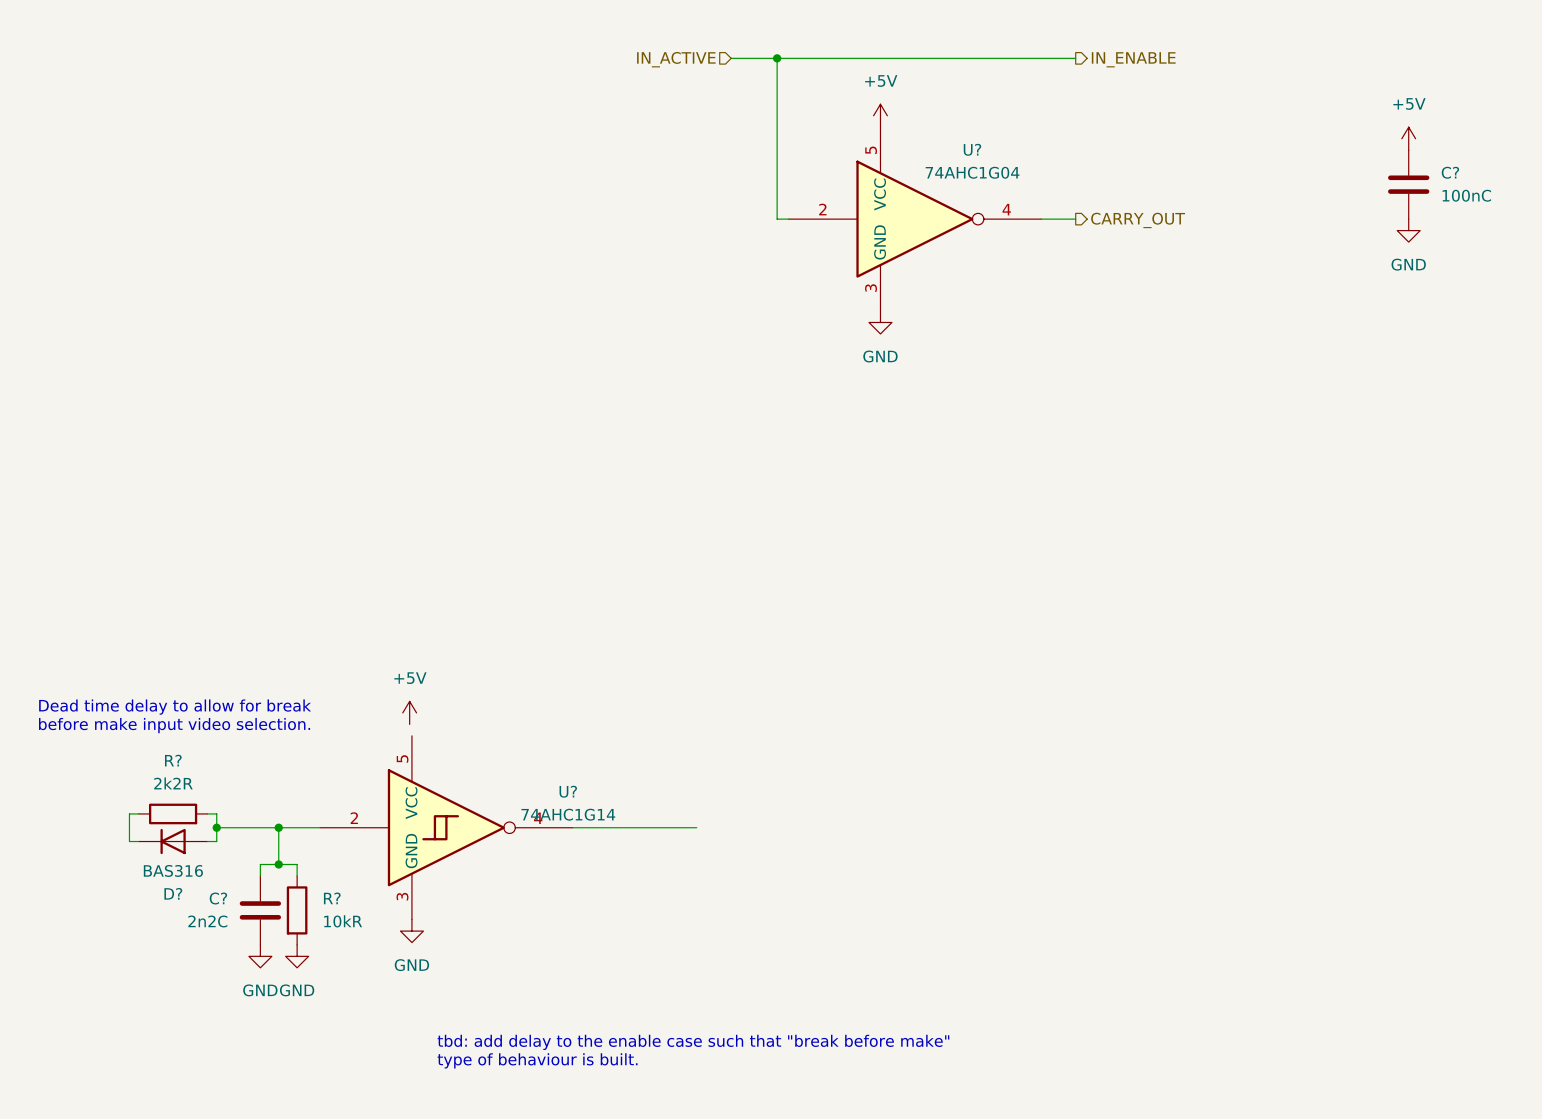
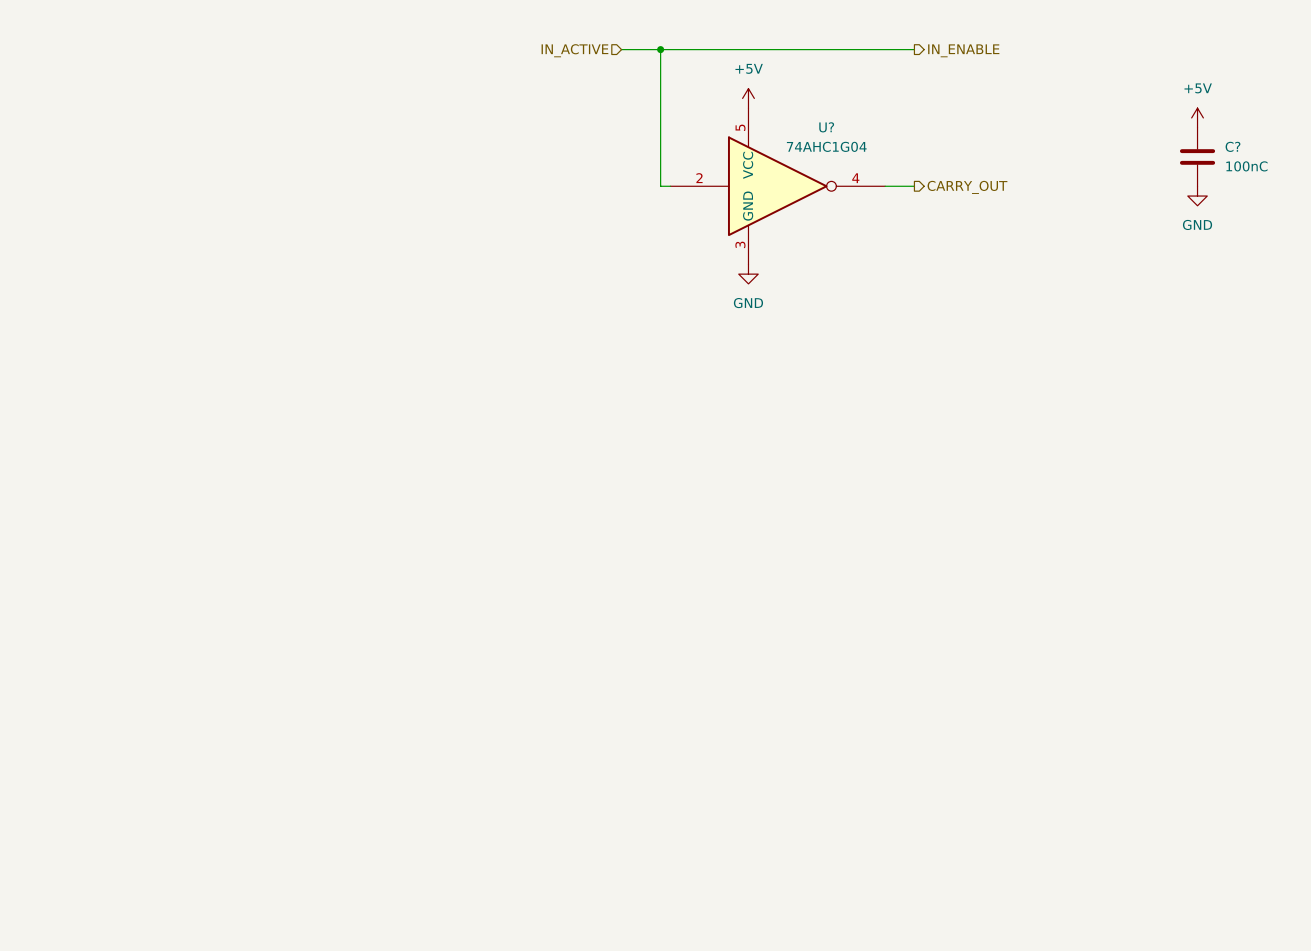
text: Dead time delay to allow for break (175, 707) -> none
power symbol: +5V (409, 712) -> none
text: before make input video selection. (174, 725) -> none
wire: (138, 813) (129, 813) (129, 841) (138, 841) -> none
R?: 2k2R (173, 813) -> none
wire: (207, 813) (216, 813) (216, 841) (207, 841) -> none
wire: (216, 827) (320, 827) -> none
junction: (216, 827) -> none
wire: (278, 827) (278, 864) -> none
junction: (278, 827) -> none
U?: 74AHC1G14 (446, 827) -> none
wire: (572, 827) (696, 827) -> none
D?: BAS316 (173, 841) -> none
junction: (278, 864) -> none
wire: (260, 875) (260, 864) (297, 864) (297, 875) -> none
C?: 2n2C (260, 910) -> none
R?: 10kR (297, 910) -> none
power symbol: GND (411, 931) -> none
power symbol: GND (260, 956) -> none
power symbol: GND (297, 956) -> none
text: tbd: add delay to the enable case such that "break before make" (693, 1042) -> none
text: type of behaviour is built. (537, 1060) -> none

